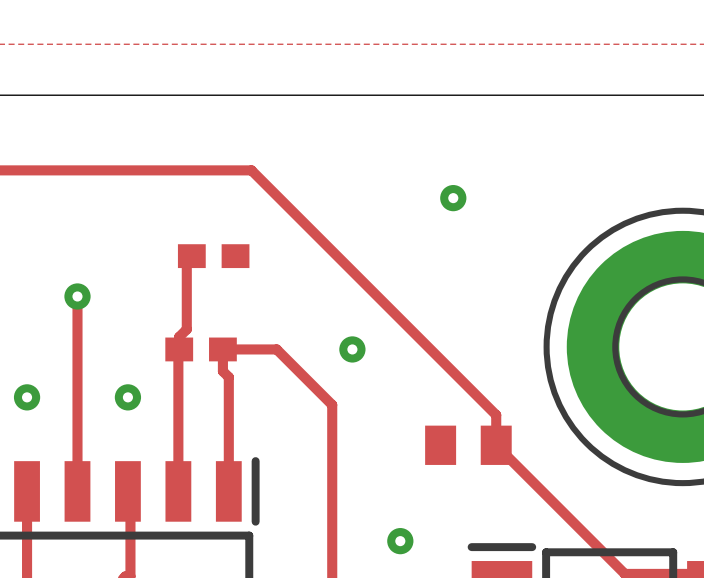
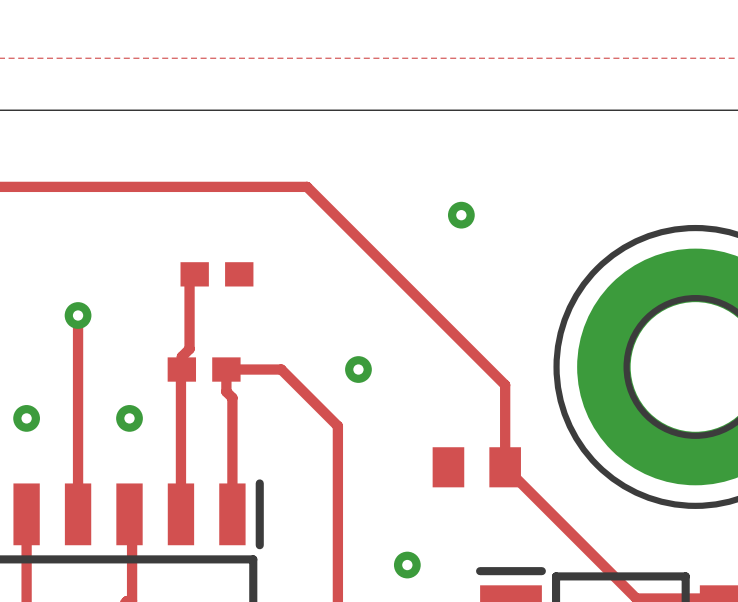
track: (251, 170) (496, 415) -> (255, 186) (307, 186) (505, 385) (505, 436)

